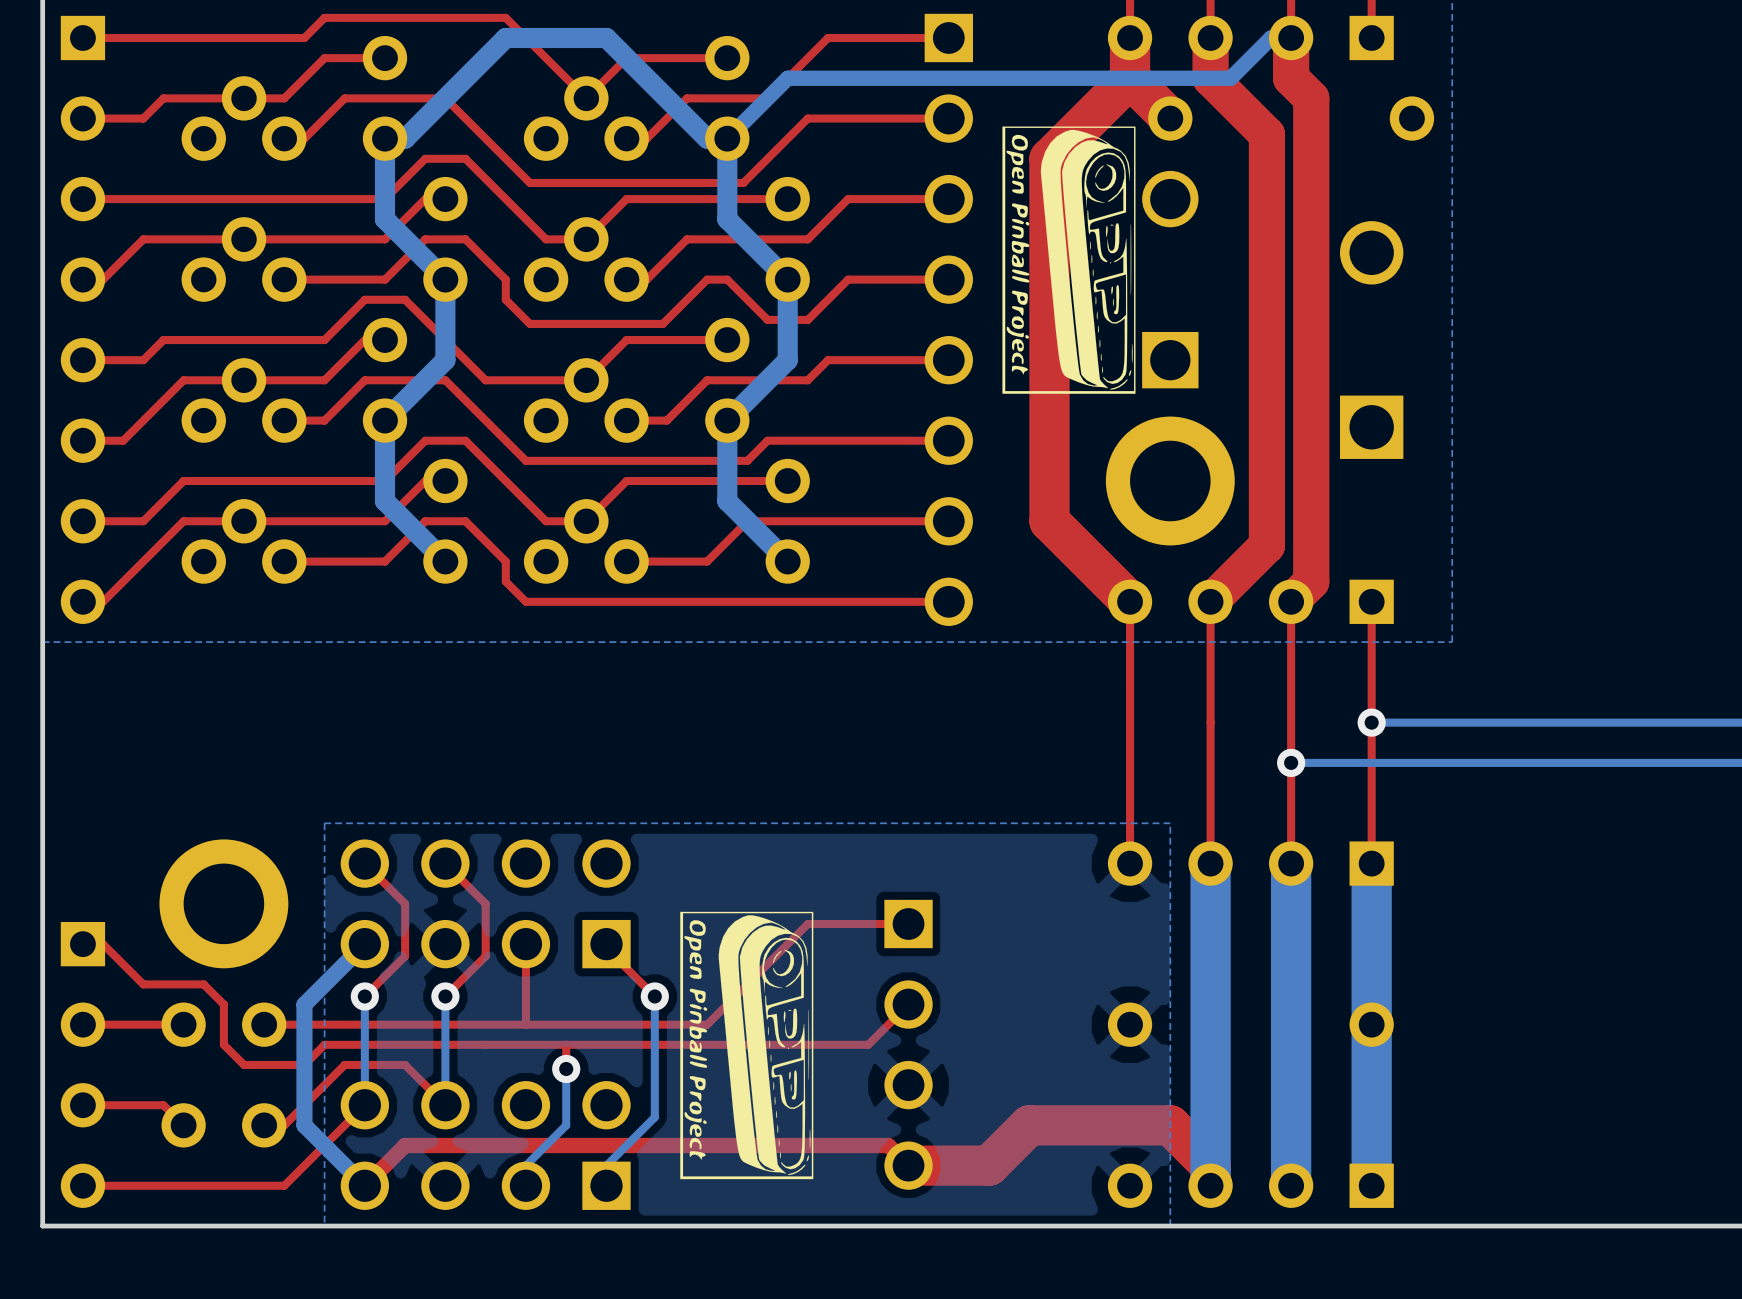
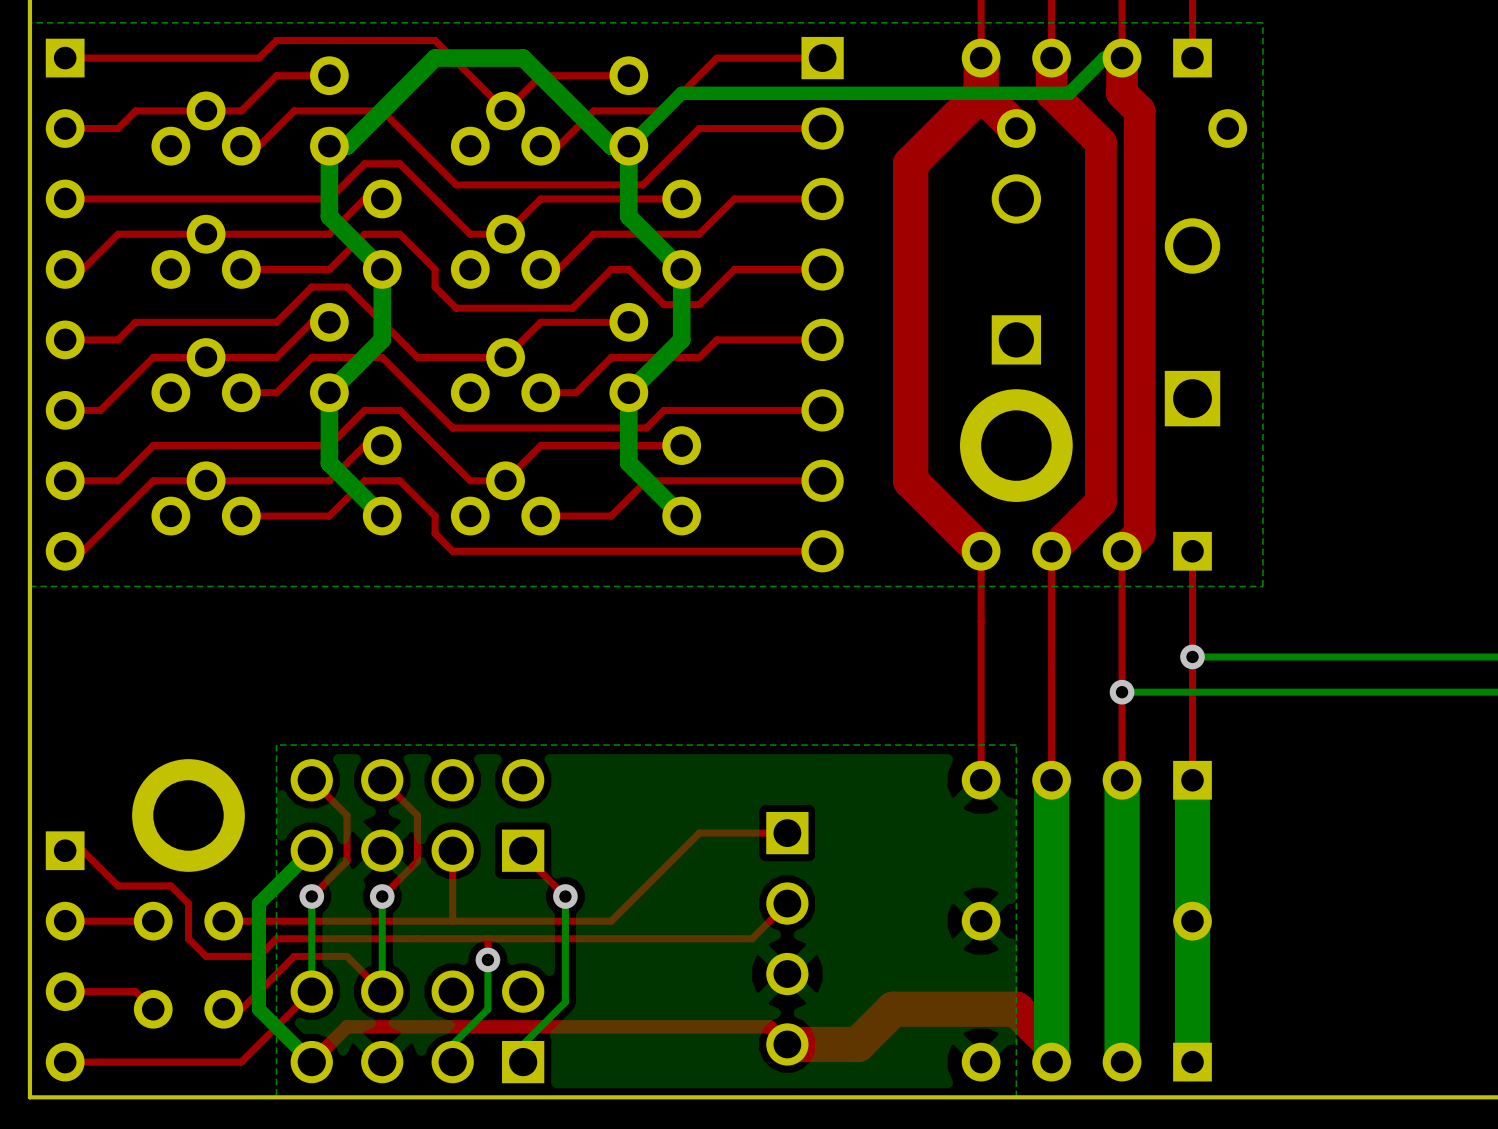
drawing: [1002, 126, 1136, 394] -> none
drawing: [680, 911, 814, 1180] -> none

